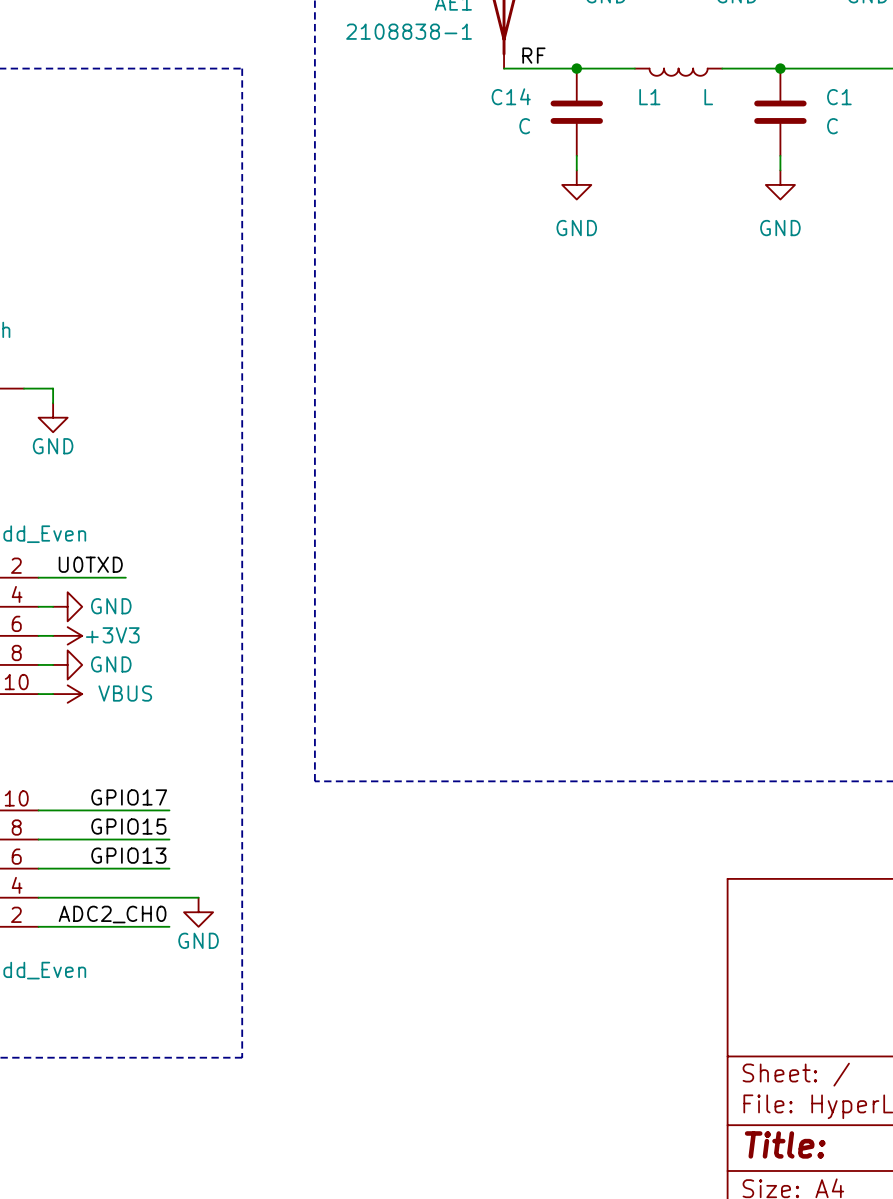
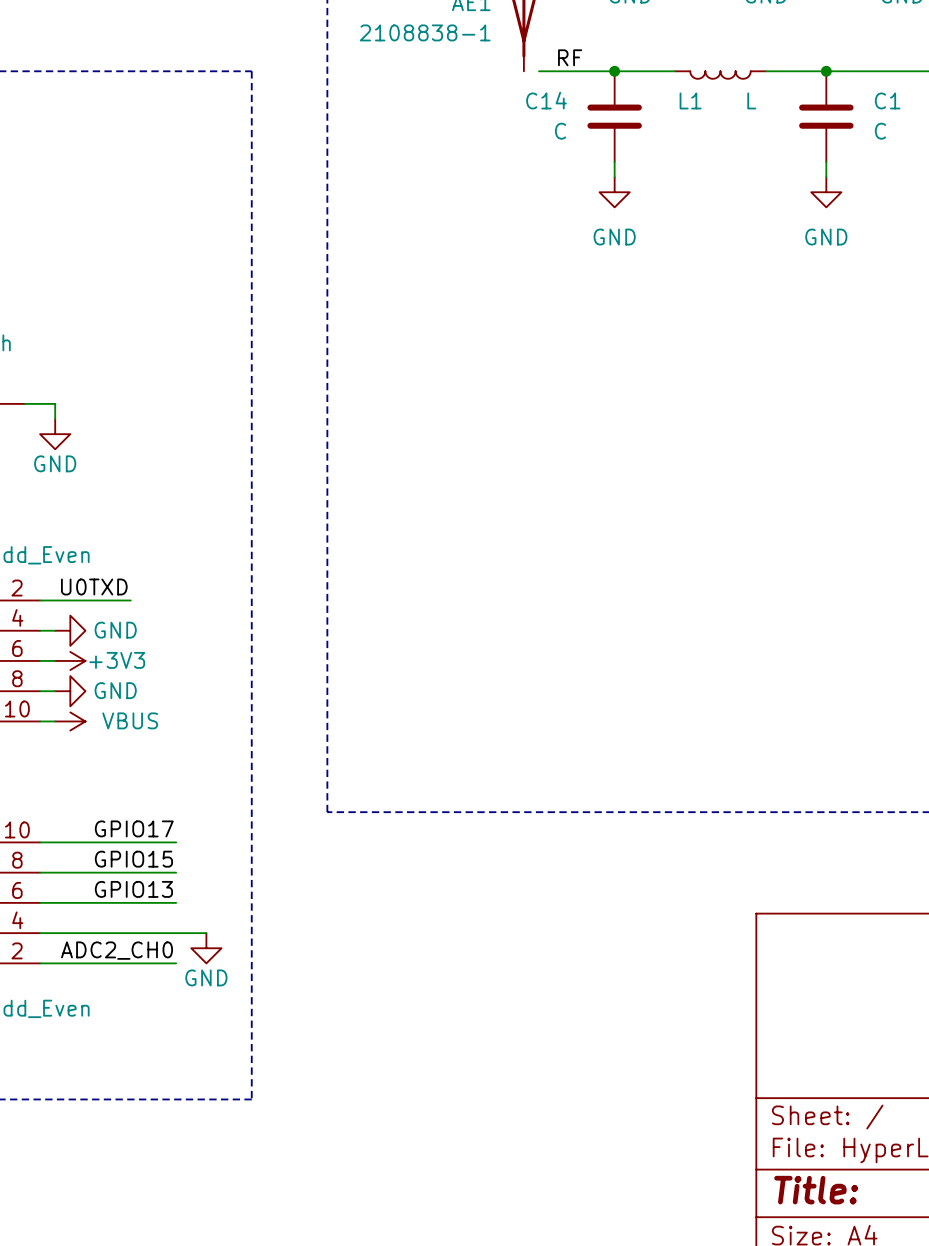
label position: RF (533, 55) -> RF (570, 57)
wire: (504, 68) (518, 68) -> none
junction position: (576, 68) -> (614, 71)
junction position: (780, 68) -> (826, 71)
L1 position: (678, 72) -> (720, 75)
C14 position: (576, 112) -> (614, 116)
C1 position: (780, 112) -> (826, 116)
wire: (576, 155) (576, 170) -> (614, 162) (614, 177)
wire: (780, 155) (780, 170) -> (826, 162) (826, 177)
power symbol position: GND (576, 184) -> GND (614, 192)
power symbol position: GND (780, 184) -> GND (826, 192)

